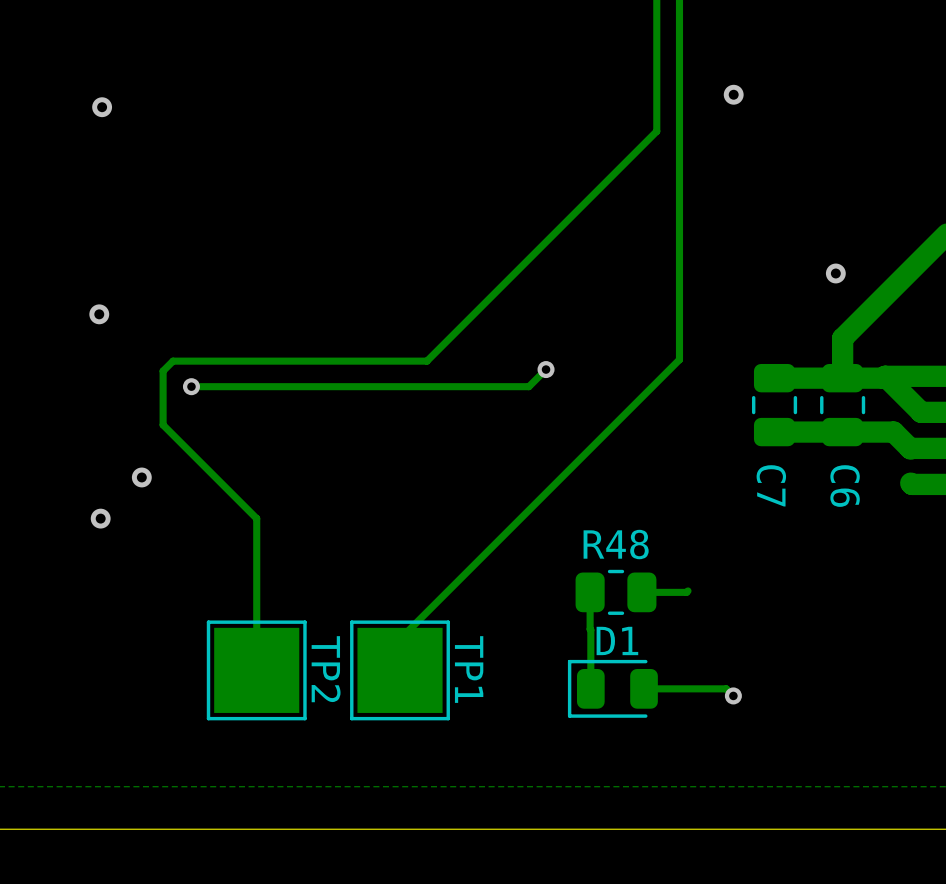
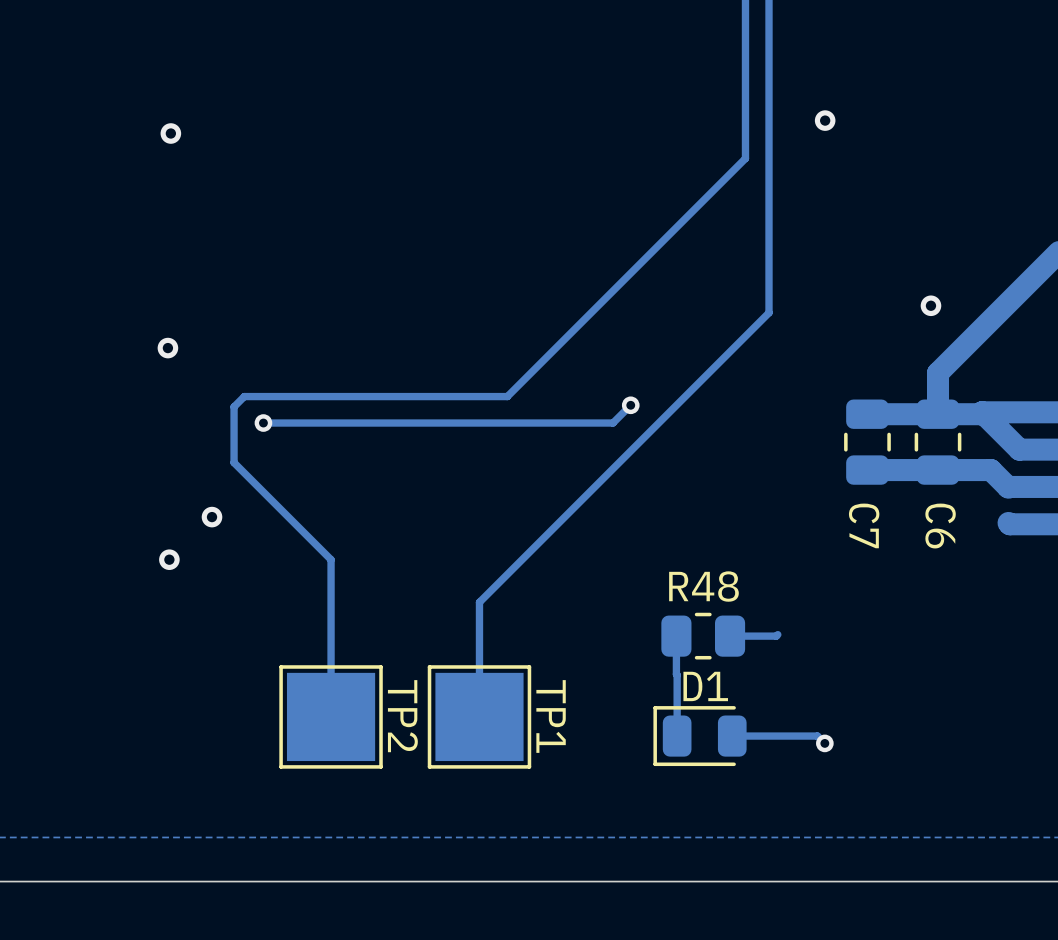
track: (679, 280) (679, 359) (400, 639) -> (769, 312) (479, 602) (479, 684)

